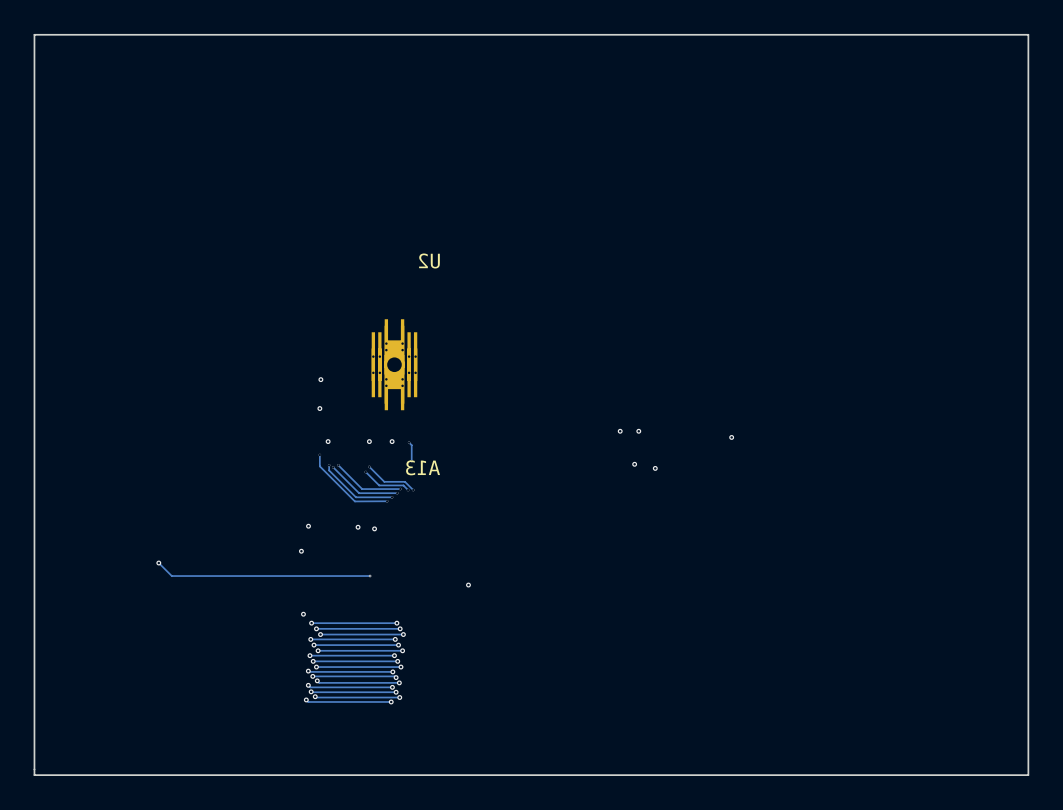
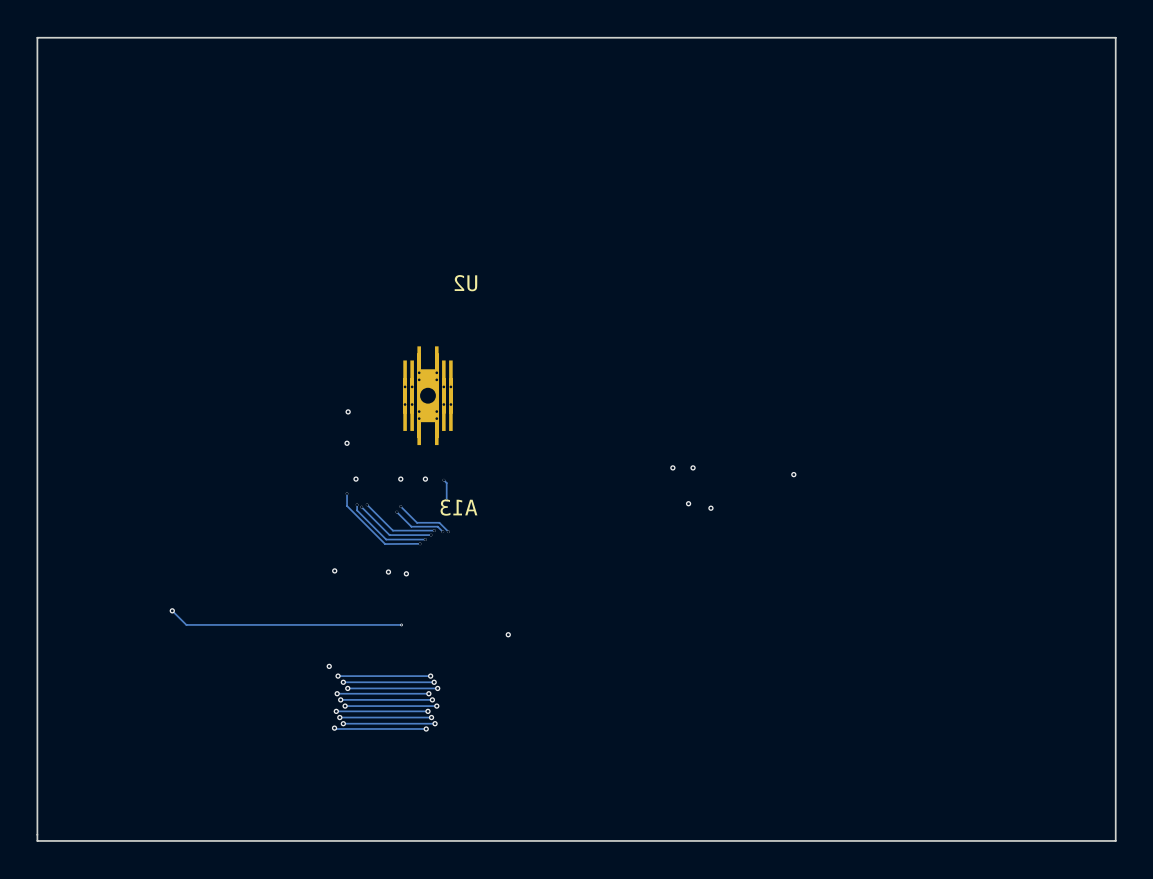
via: (301, 551) -> none
track: (312, 676) (396, 677) -> none
via: (312, 676) -> none
via: (396, 677) -> none
track: (317, 680) (319, 682) (399, 682) -> none
via: (317, 680) -> none
via: (399, 682) -> none
track: (308, 685) (310, 687) (392, 687) -> none
via: (308, 685) -> none
via: (392, 687) -> none
track: (311, 691) (396, 692) -> none
via: (311, 691) -> none
via: (396, 692) -> none
track: (315, 696) (399, 697) -> none
via: (315, 696) -> none
via: (399, 697) -> none
track: (306, 699) (308, 701) (391, 701) -> none
via: (306, 699) -> none
via: (391, 701) -> none

